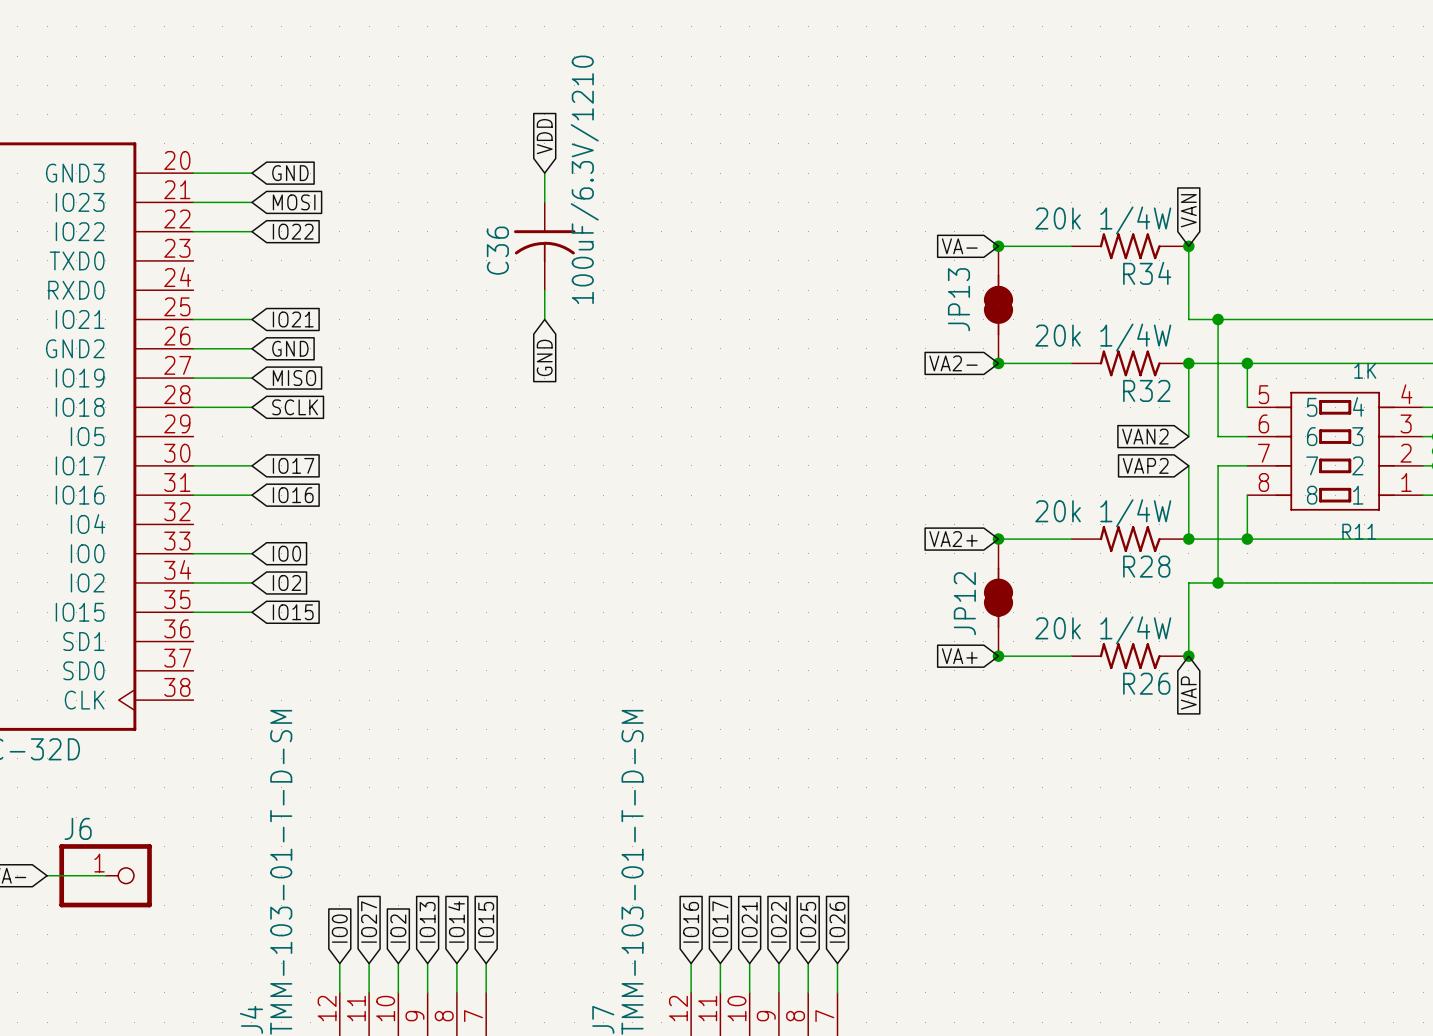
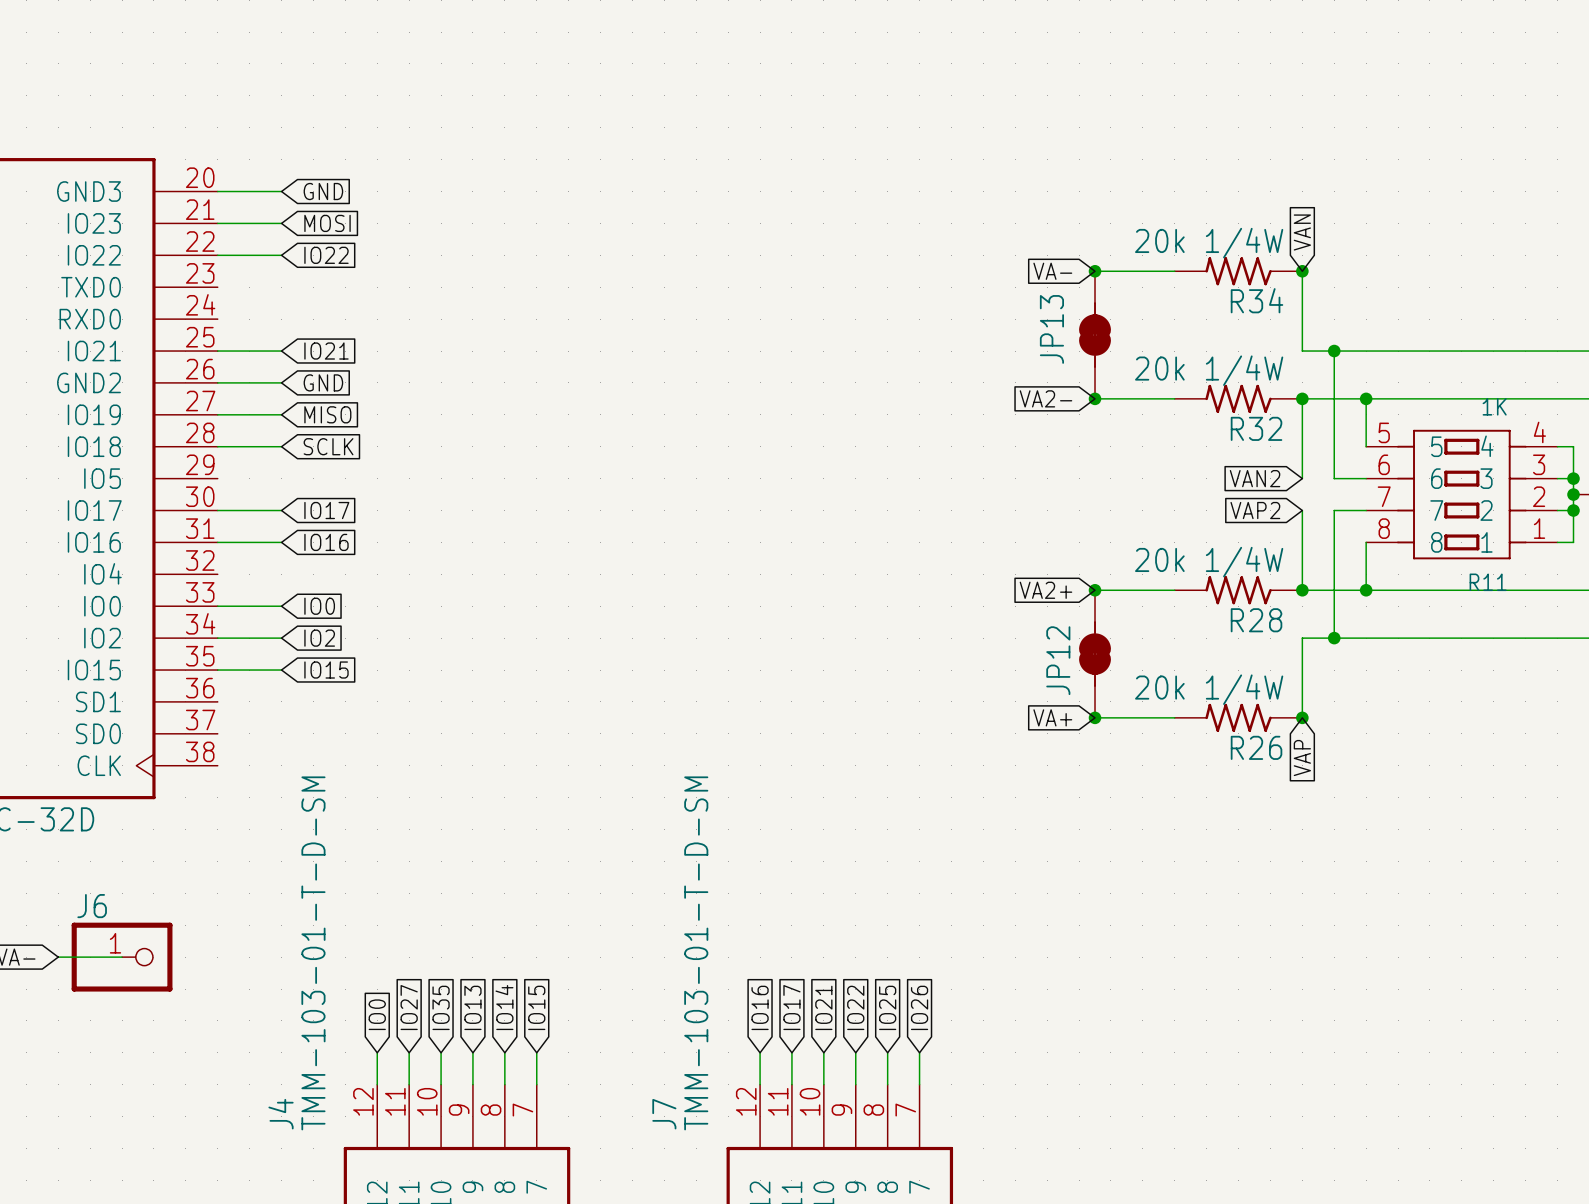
global label: VDD (544, 136) -> none
wire: (544, 173) (544, 202) -> none
C36: 100uF/6.3V/1210 (544, 246) -> none
wire: (544, 290) (544, 319) -> none
global label: GND (544, 357) -> none
global label: IO2 (398, 928) -> IO35 (441, 1007)

